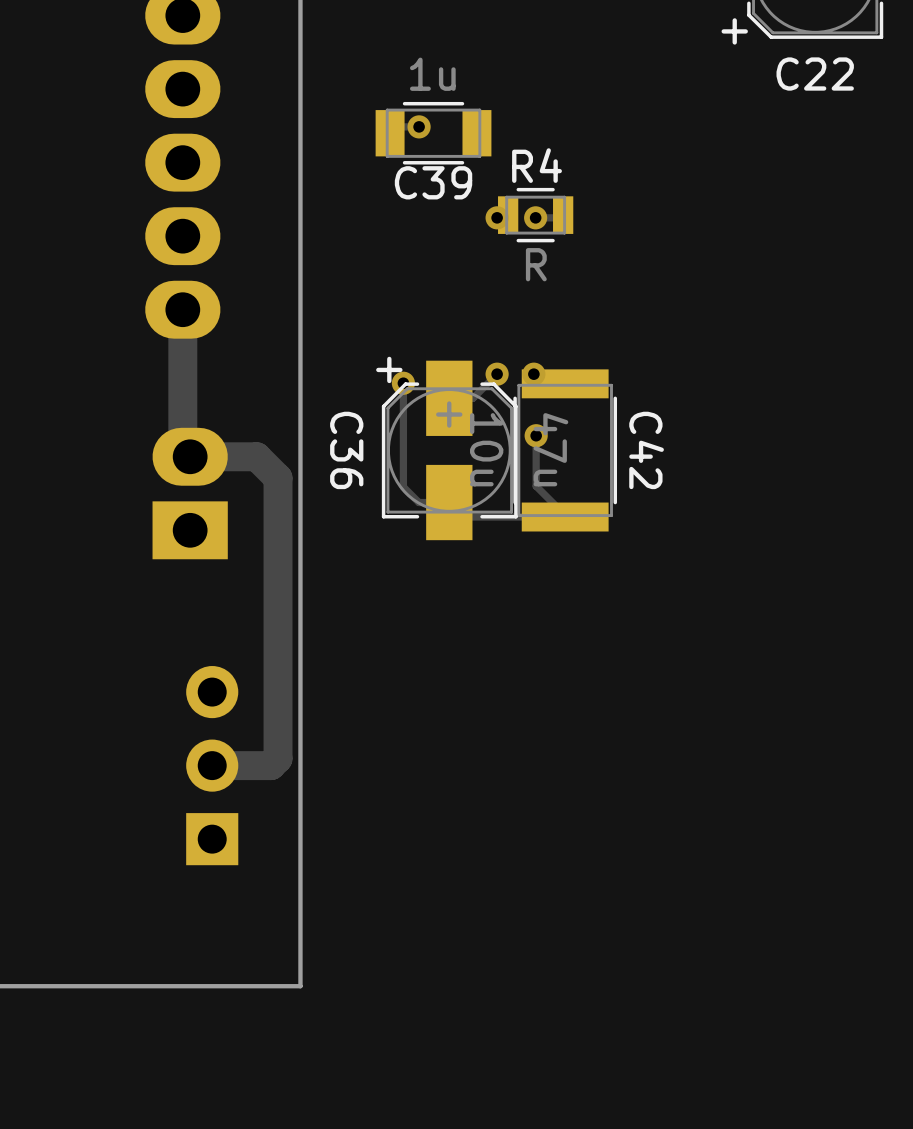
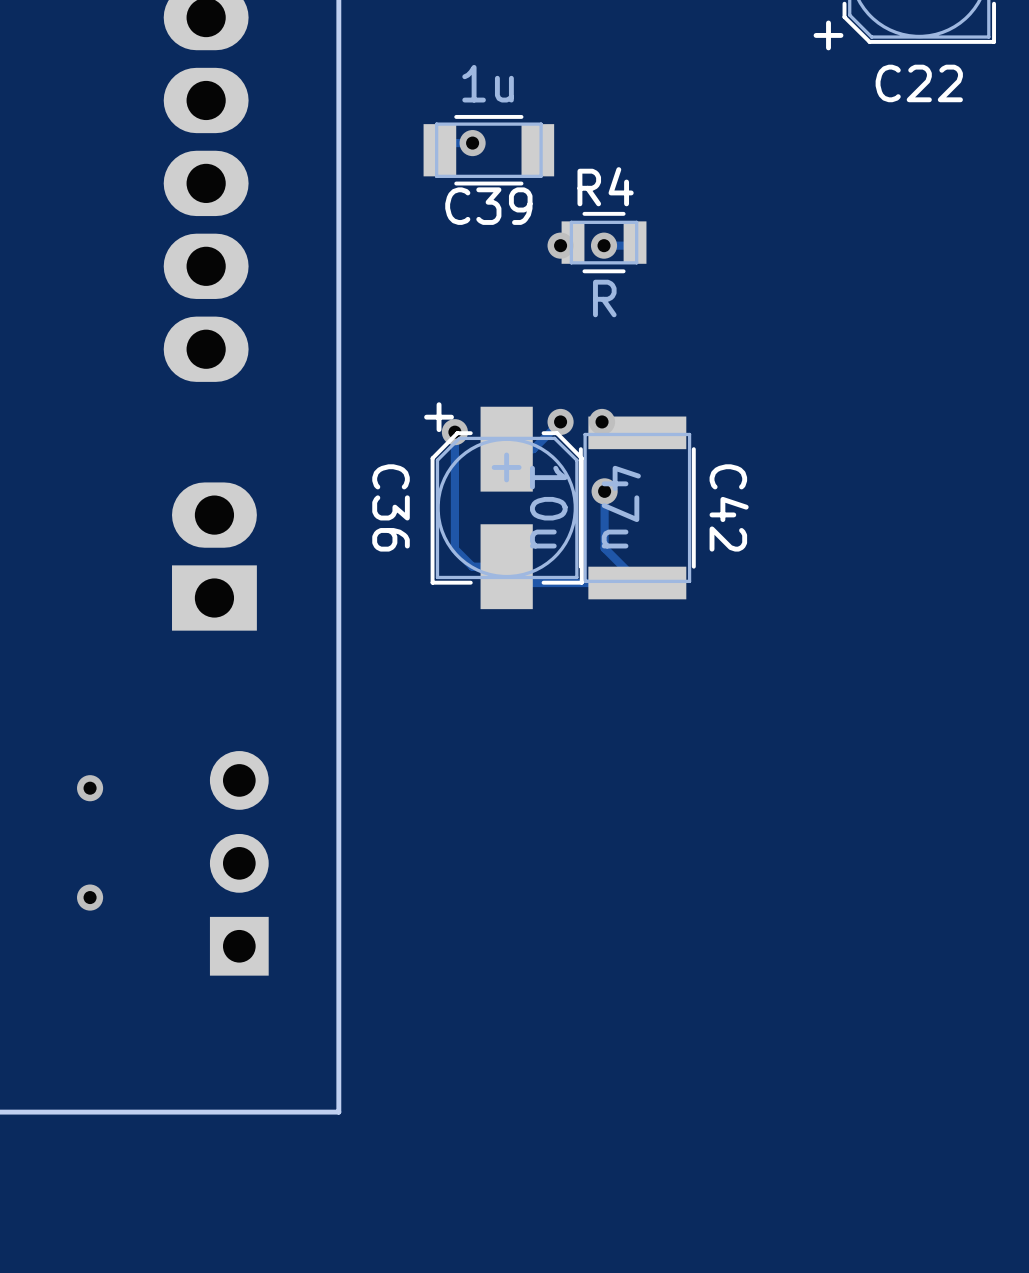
track: (182, 309) (182, 449) (190, 456) (256, 456) (278, 478) (278, 758) (271, 765) (212, 765) -> none
via: none -> (90, 788)
via: none -> (90, 897)

